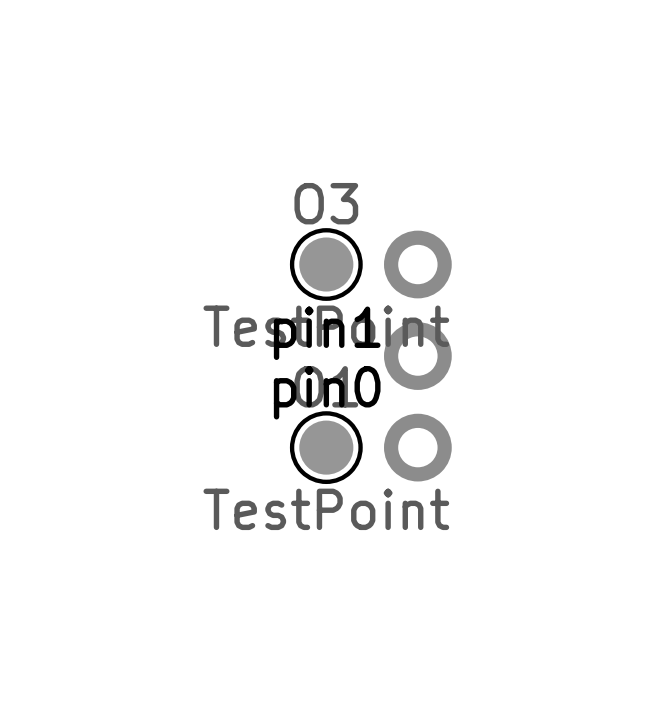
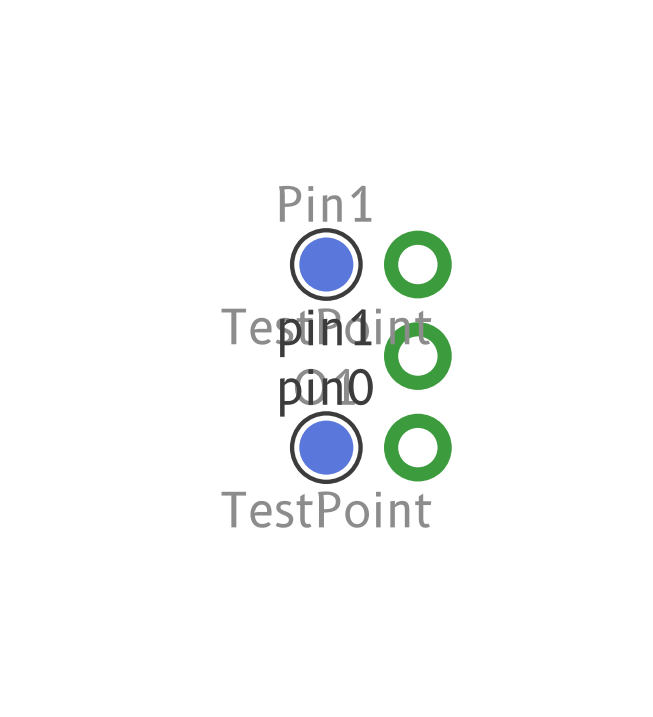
O3 name: O3 (326, 203) -> Pin1 (325, 203)

